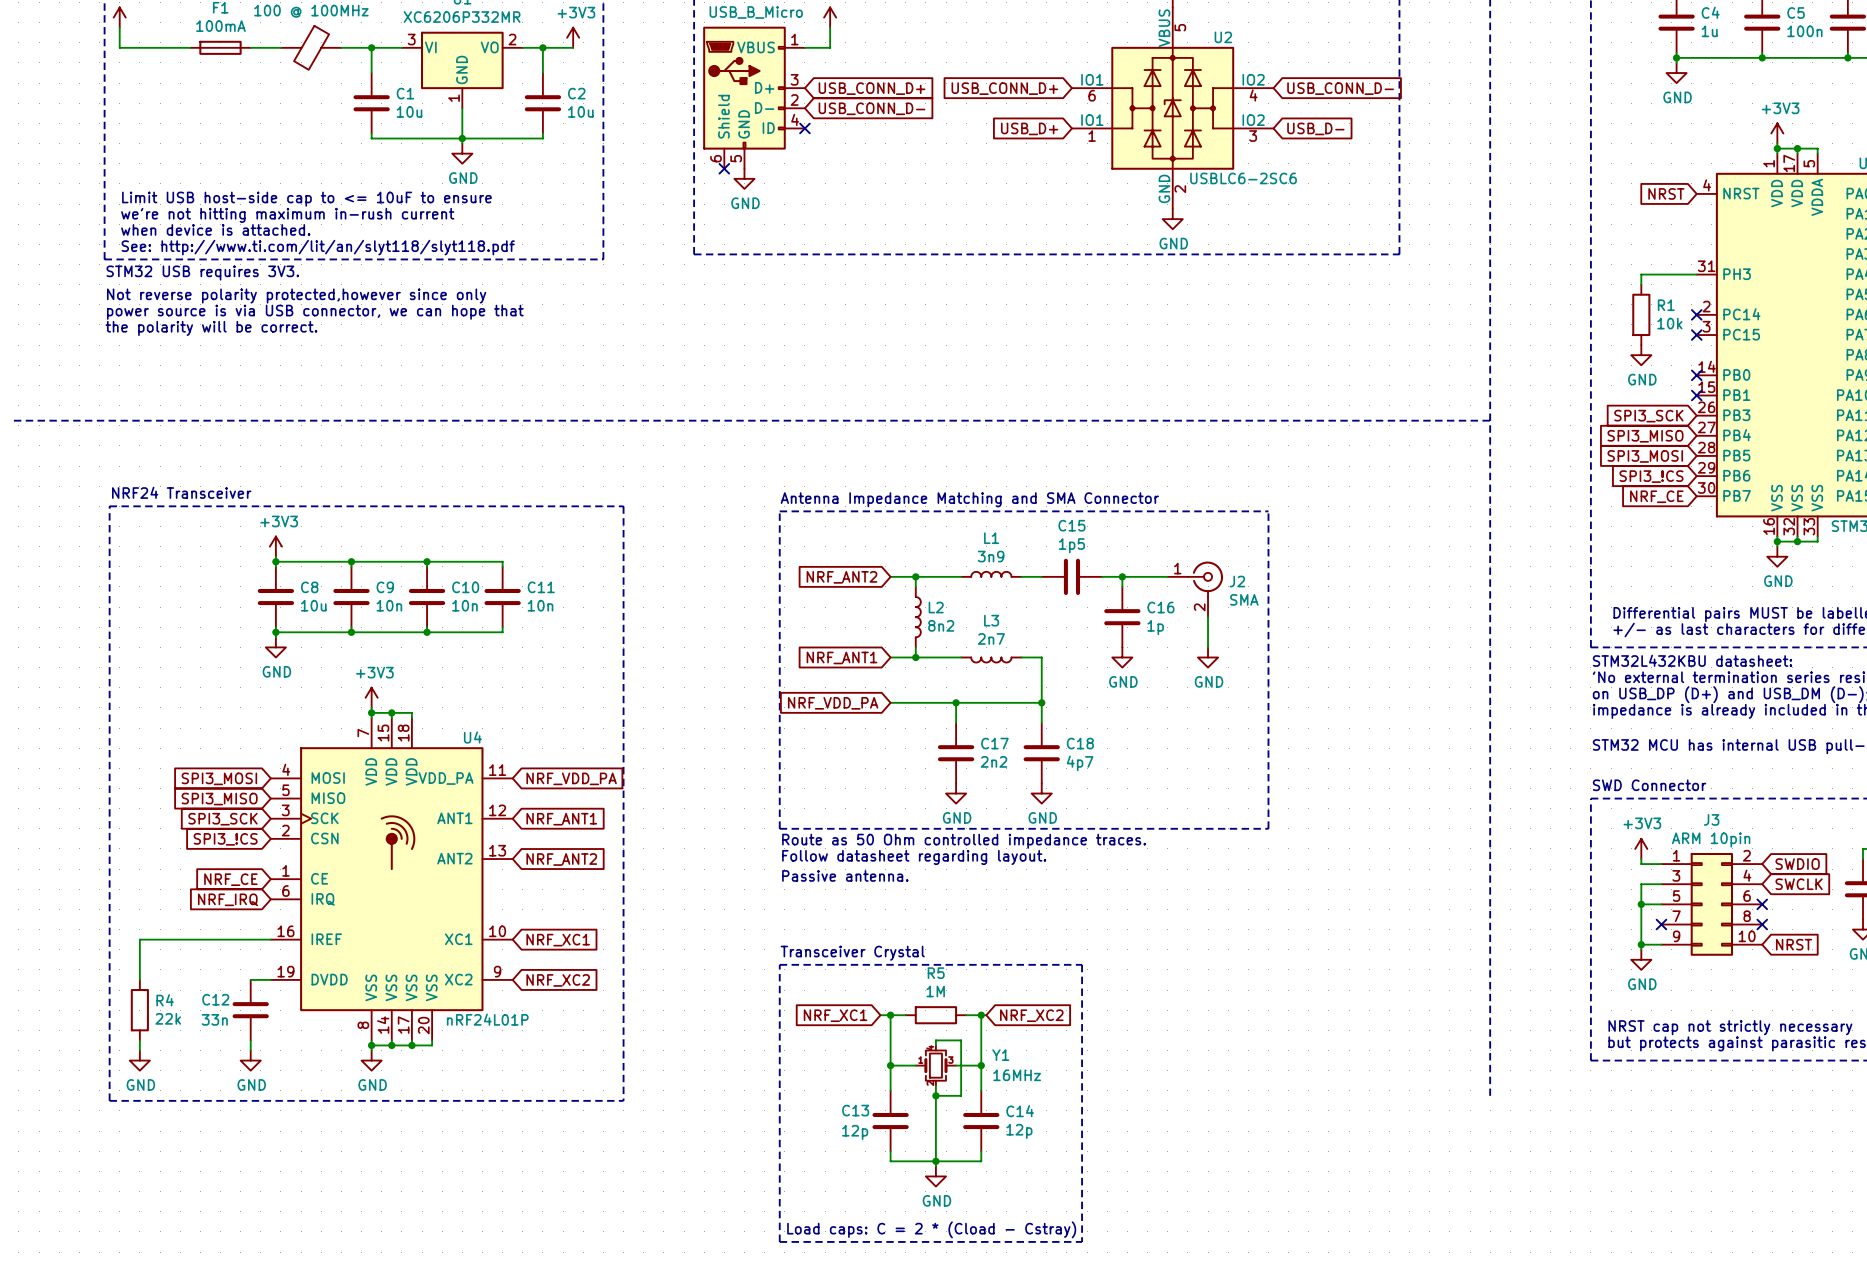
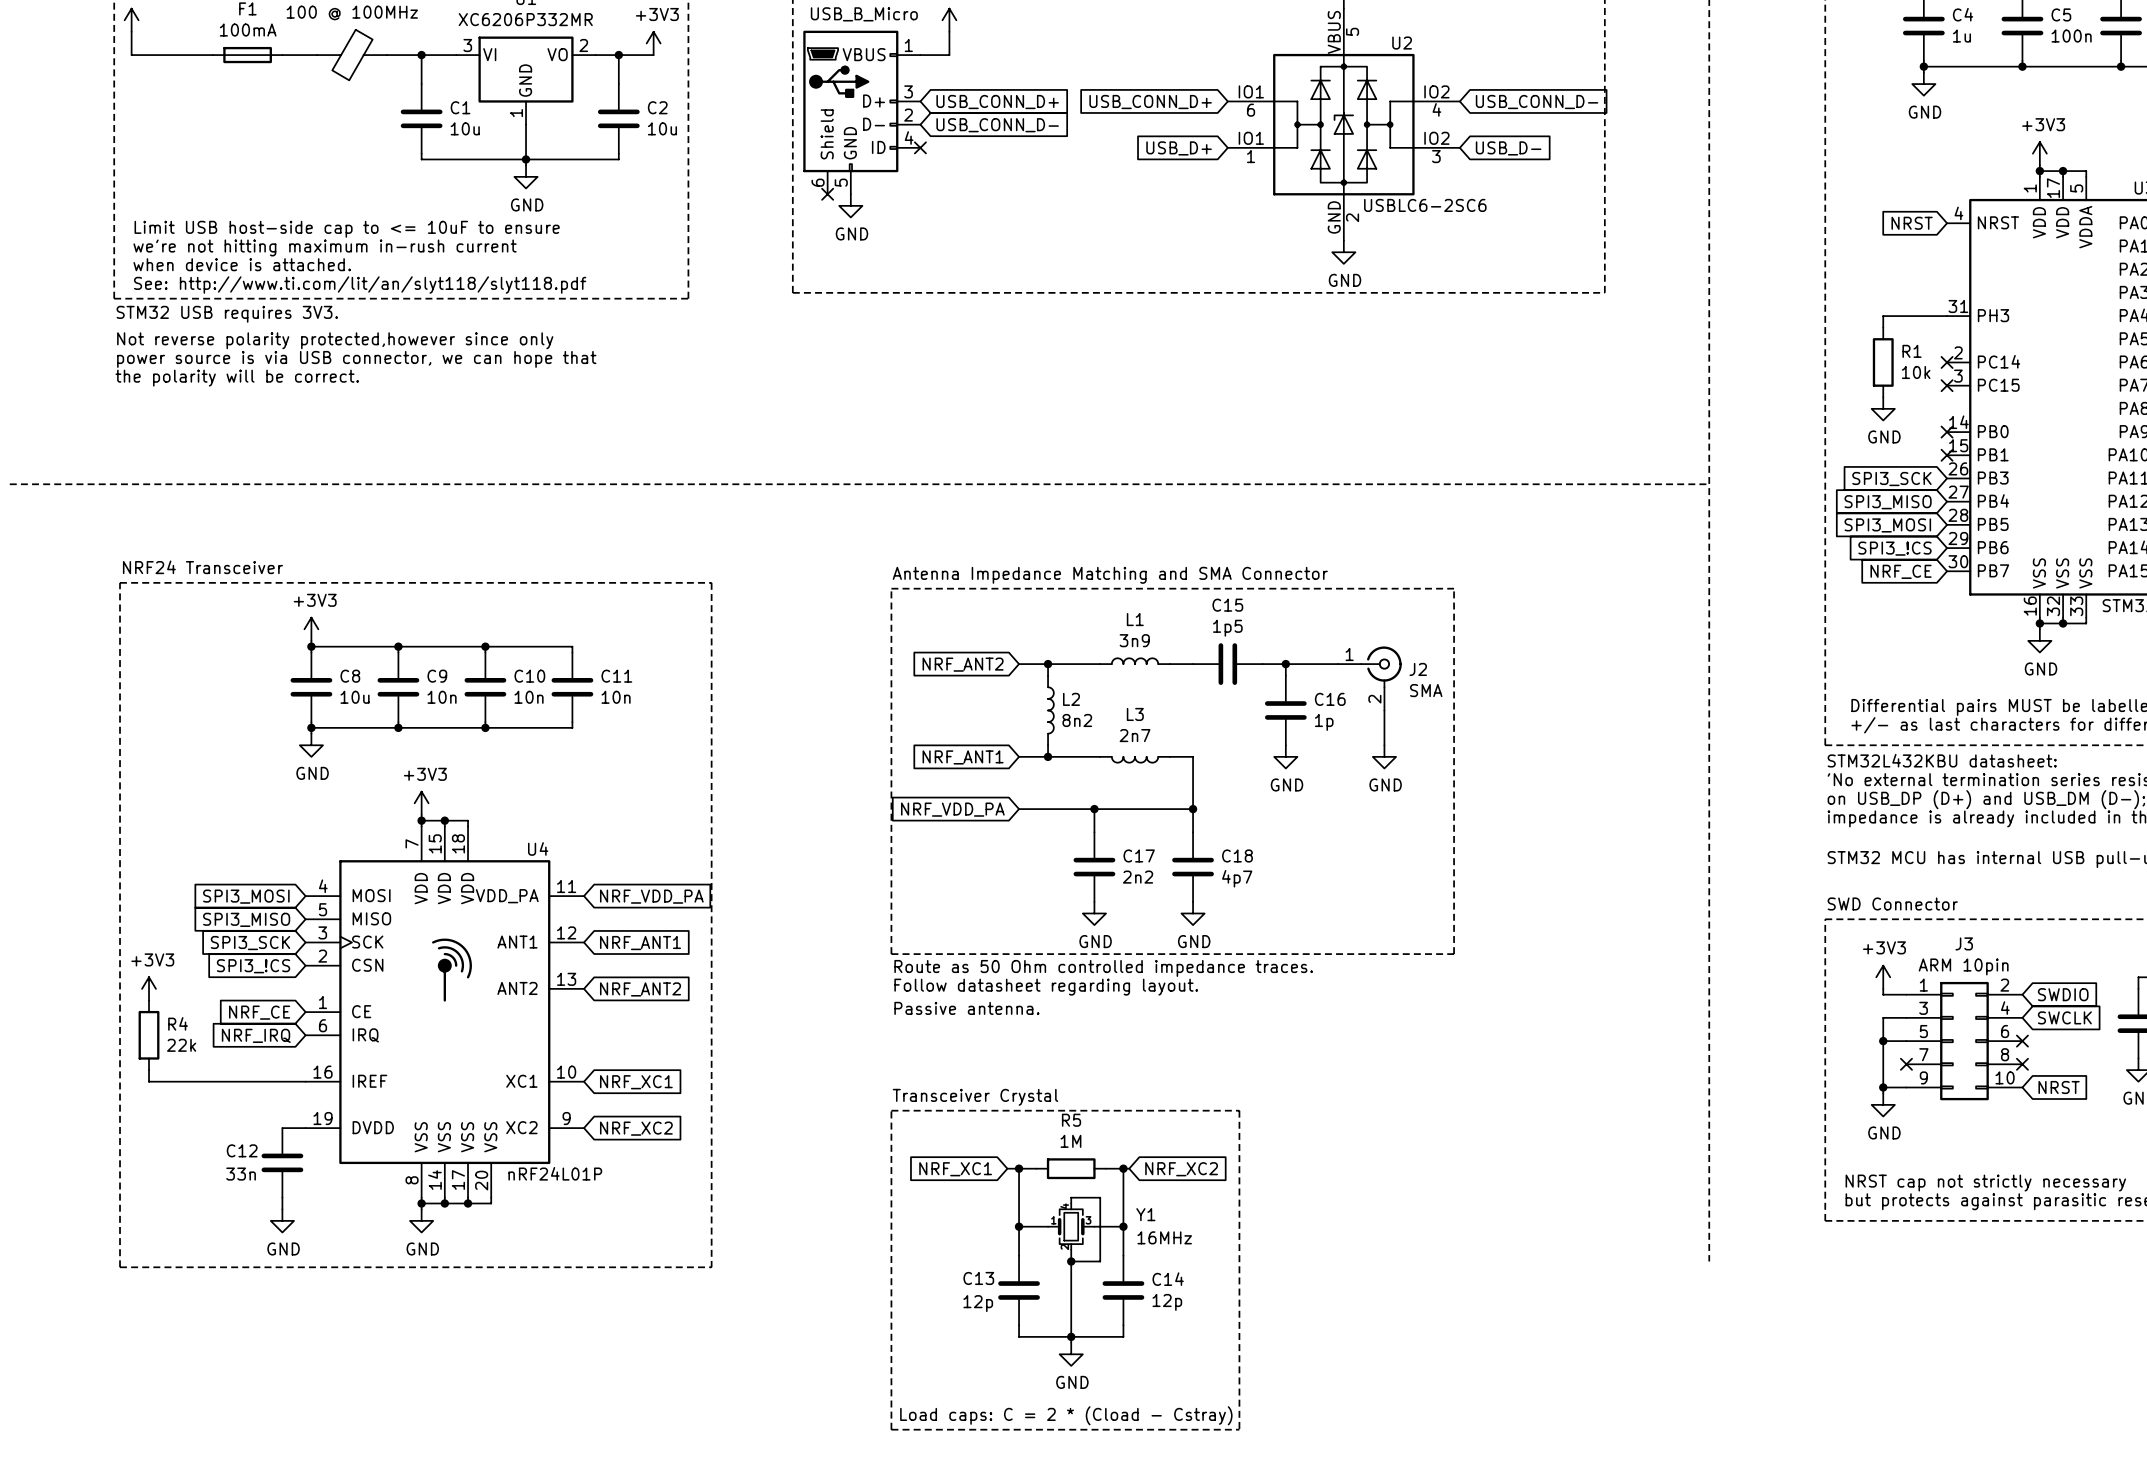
power symbol: none -> +3V3 (149, 988)
wire: (139, 939) (139, 979) -> (154, 1081) (149, 1081) (149, 1070)
R4 position: (139, 1010) -> (149, 1035)
wire: (139, 1040) (139, 1050) -> none
power symbol: GND (139, 1060) -> none

